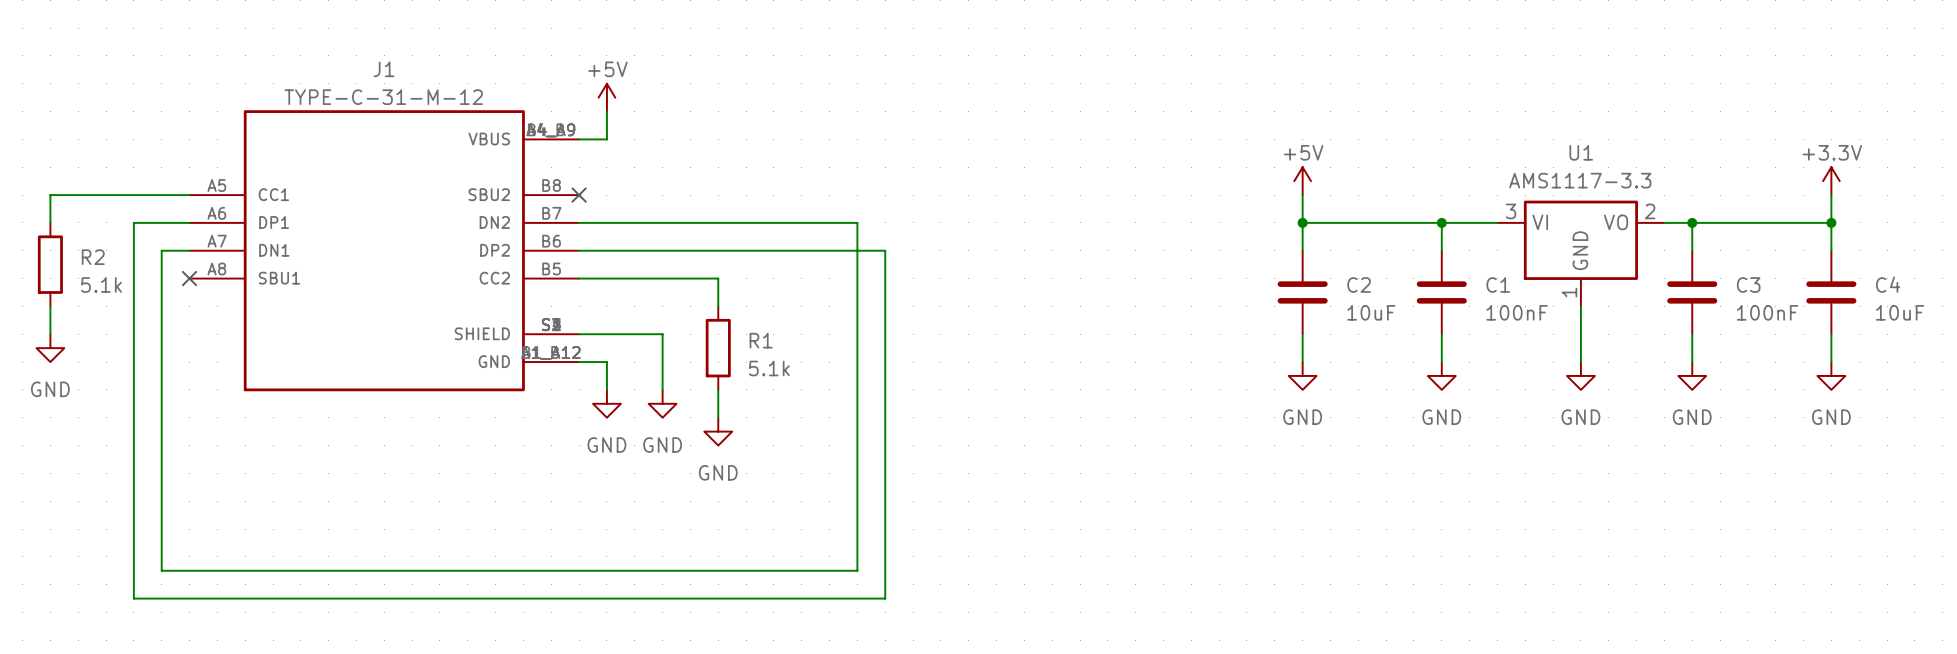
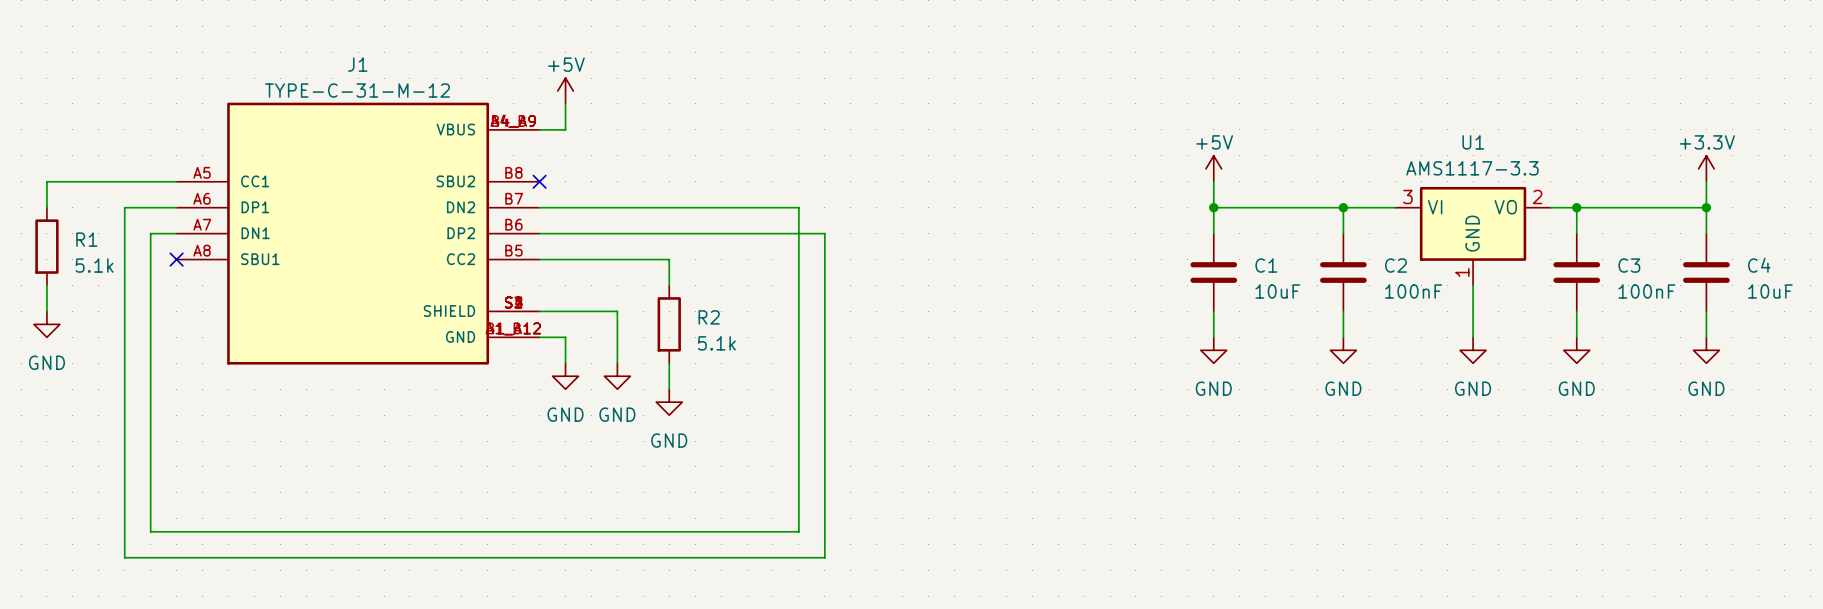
R2 name: R2 (93, 257) -> R1 (86, 239)
C2 name: C2 (1359, 285) -> C1 (1266, 265)
C1 name: C1 (1498, 285) -> C2 (1395, 265)
R1 name: R1 (761, 340) -> R2 (709, 317)

